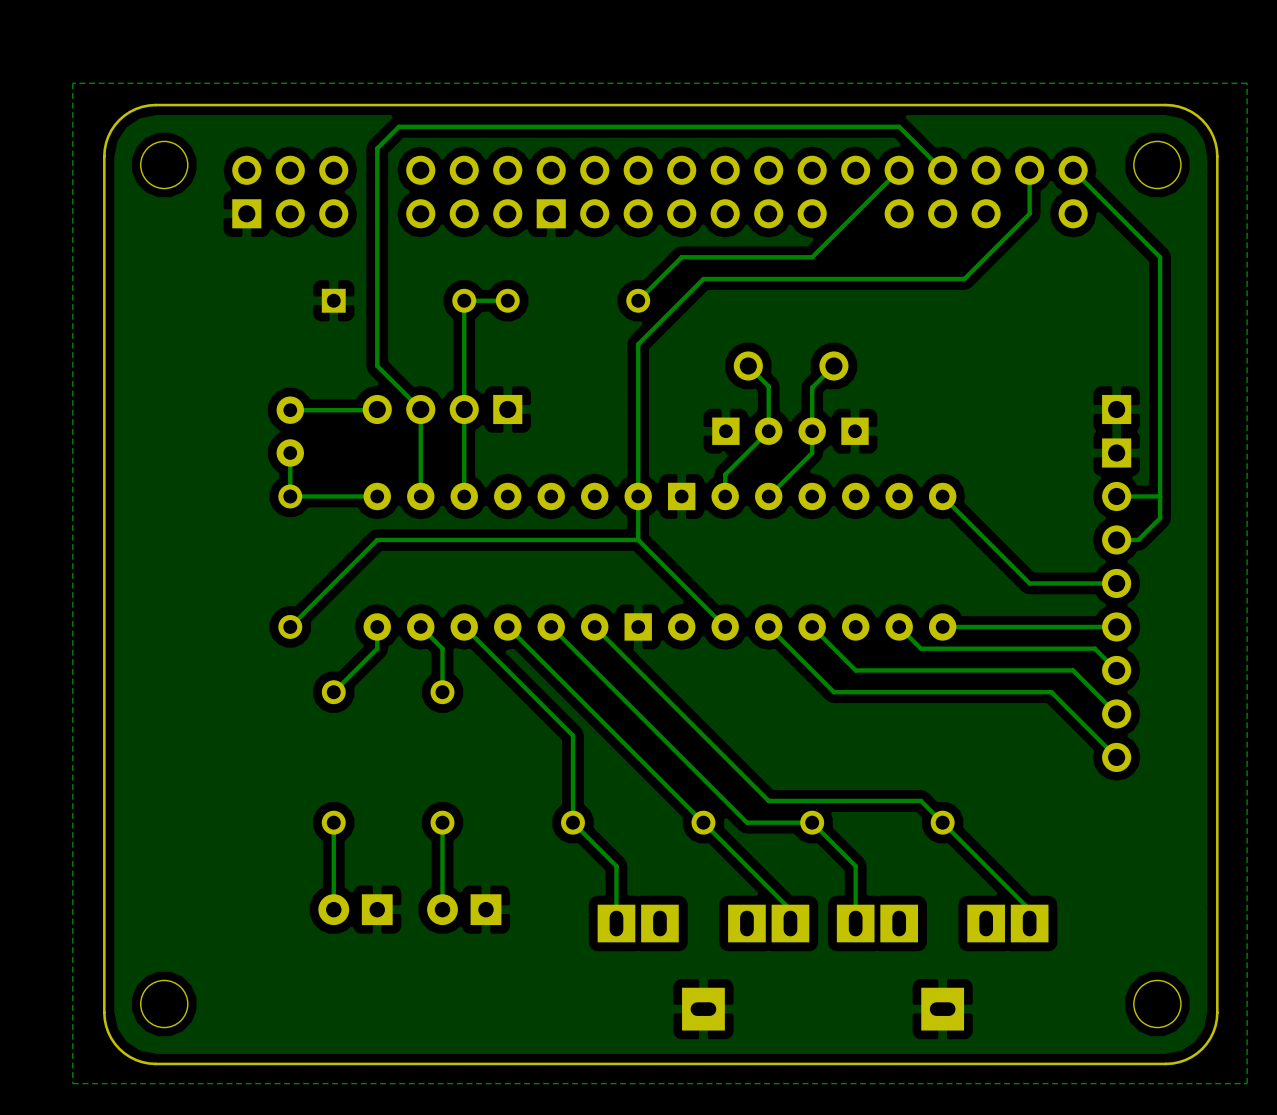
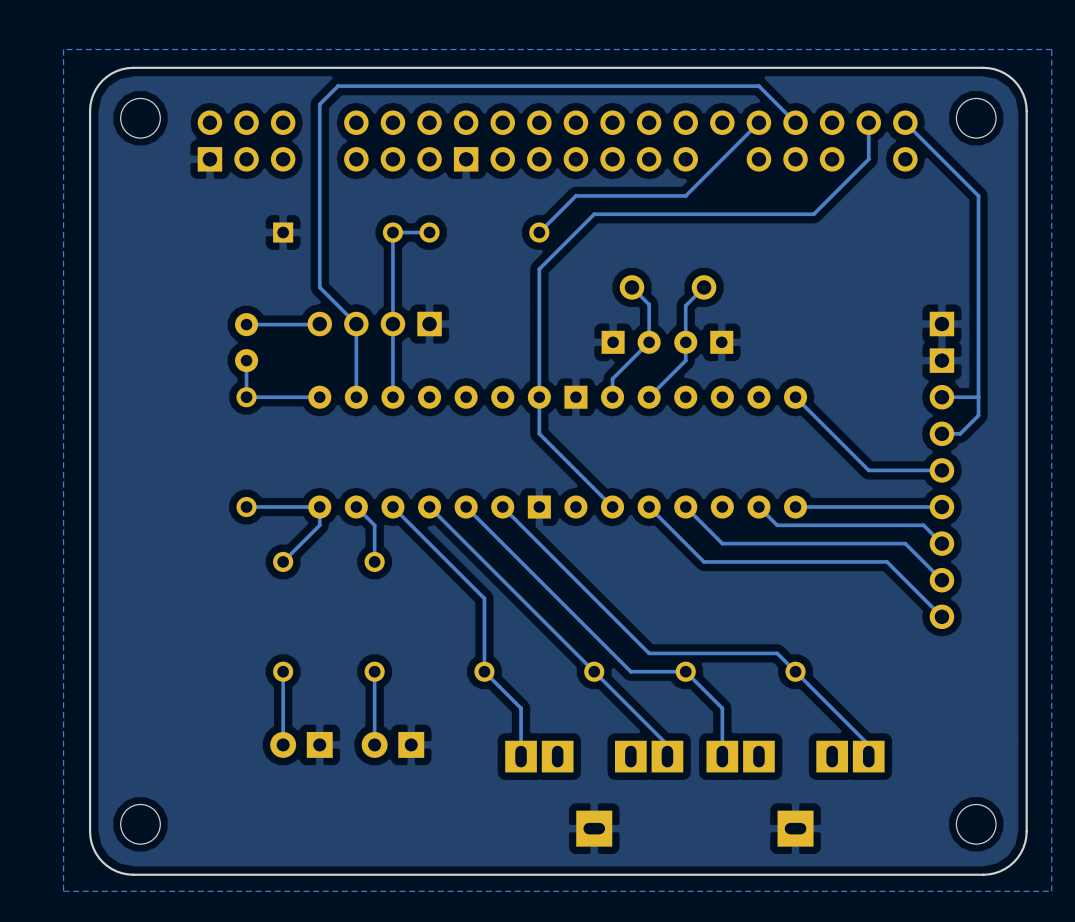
track: (638, 539) (377, 539) (290, 626) -> (319, 507) (246, 507)

